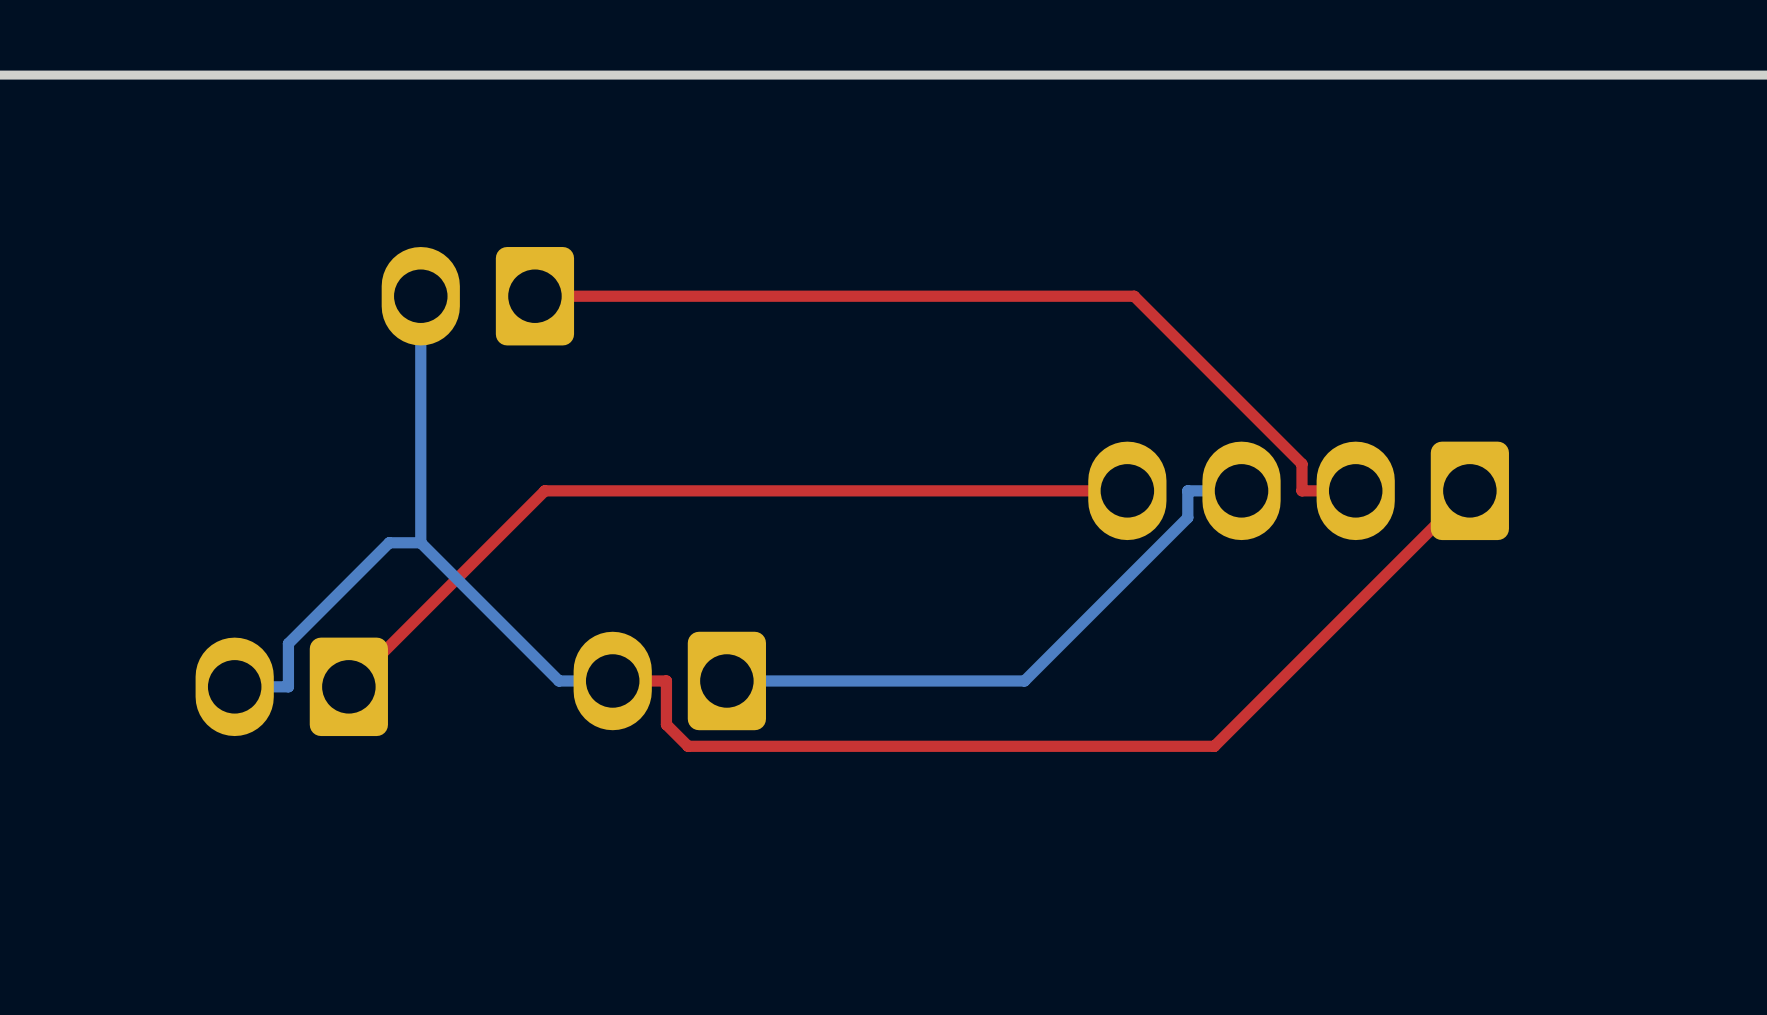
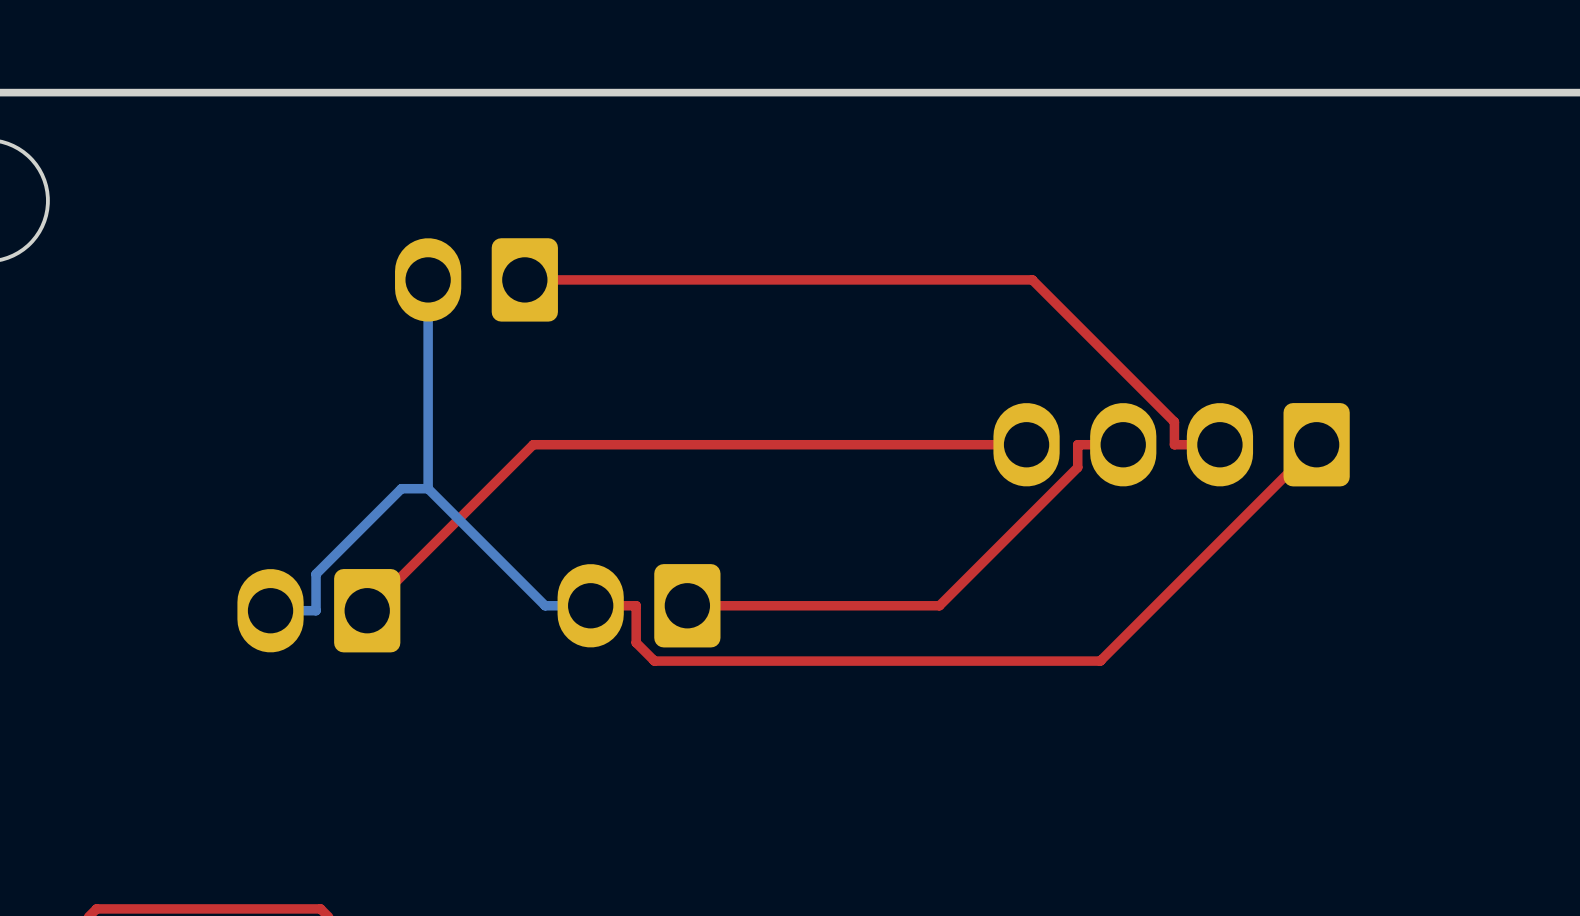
bottom track: (1241, 490) (1187, 490) (1187, 517) (1024, 680) (726, 680) -> none
top track: none -> (1123, 444) (1077, 444) (1077, 467) (939, 605) (687, 605)

